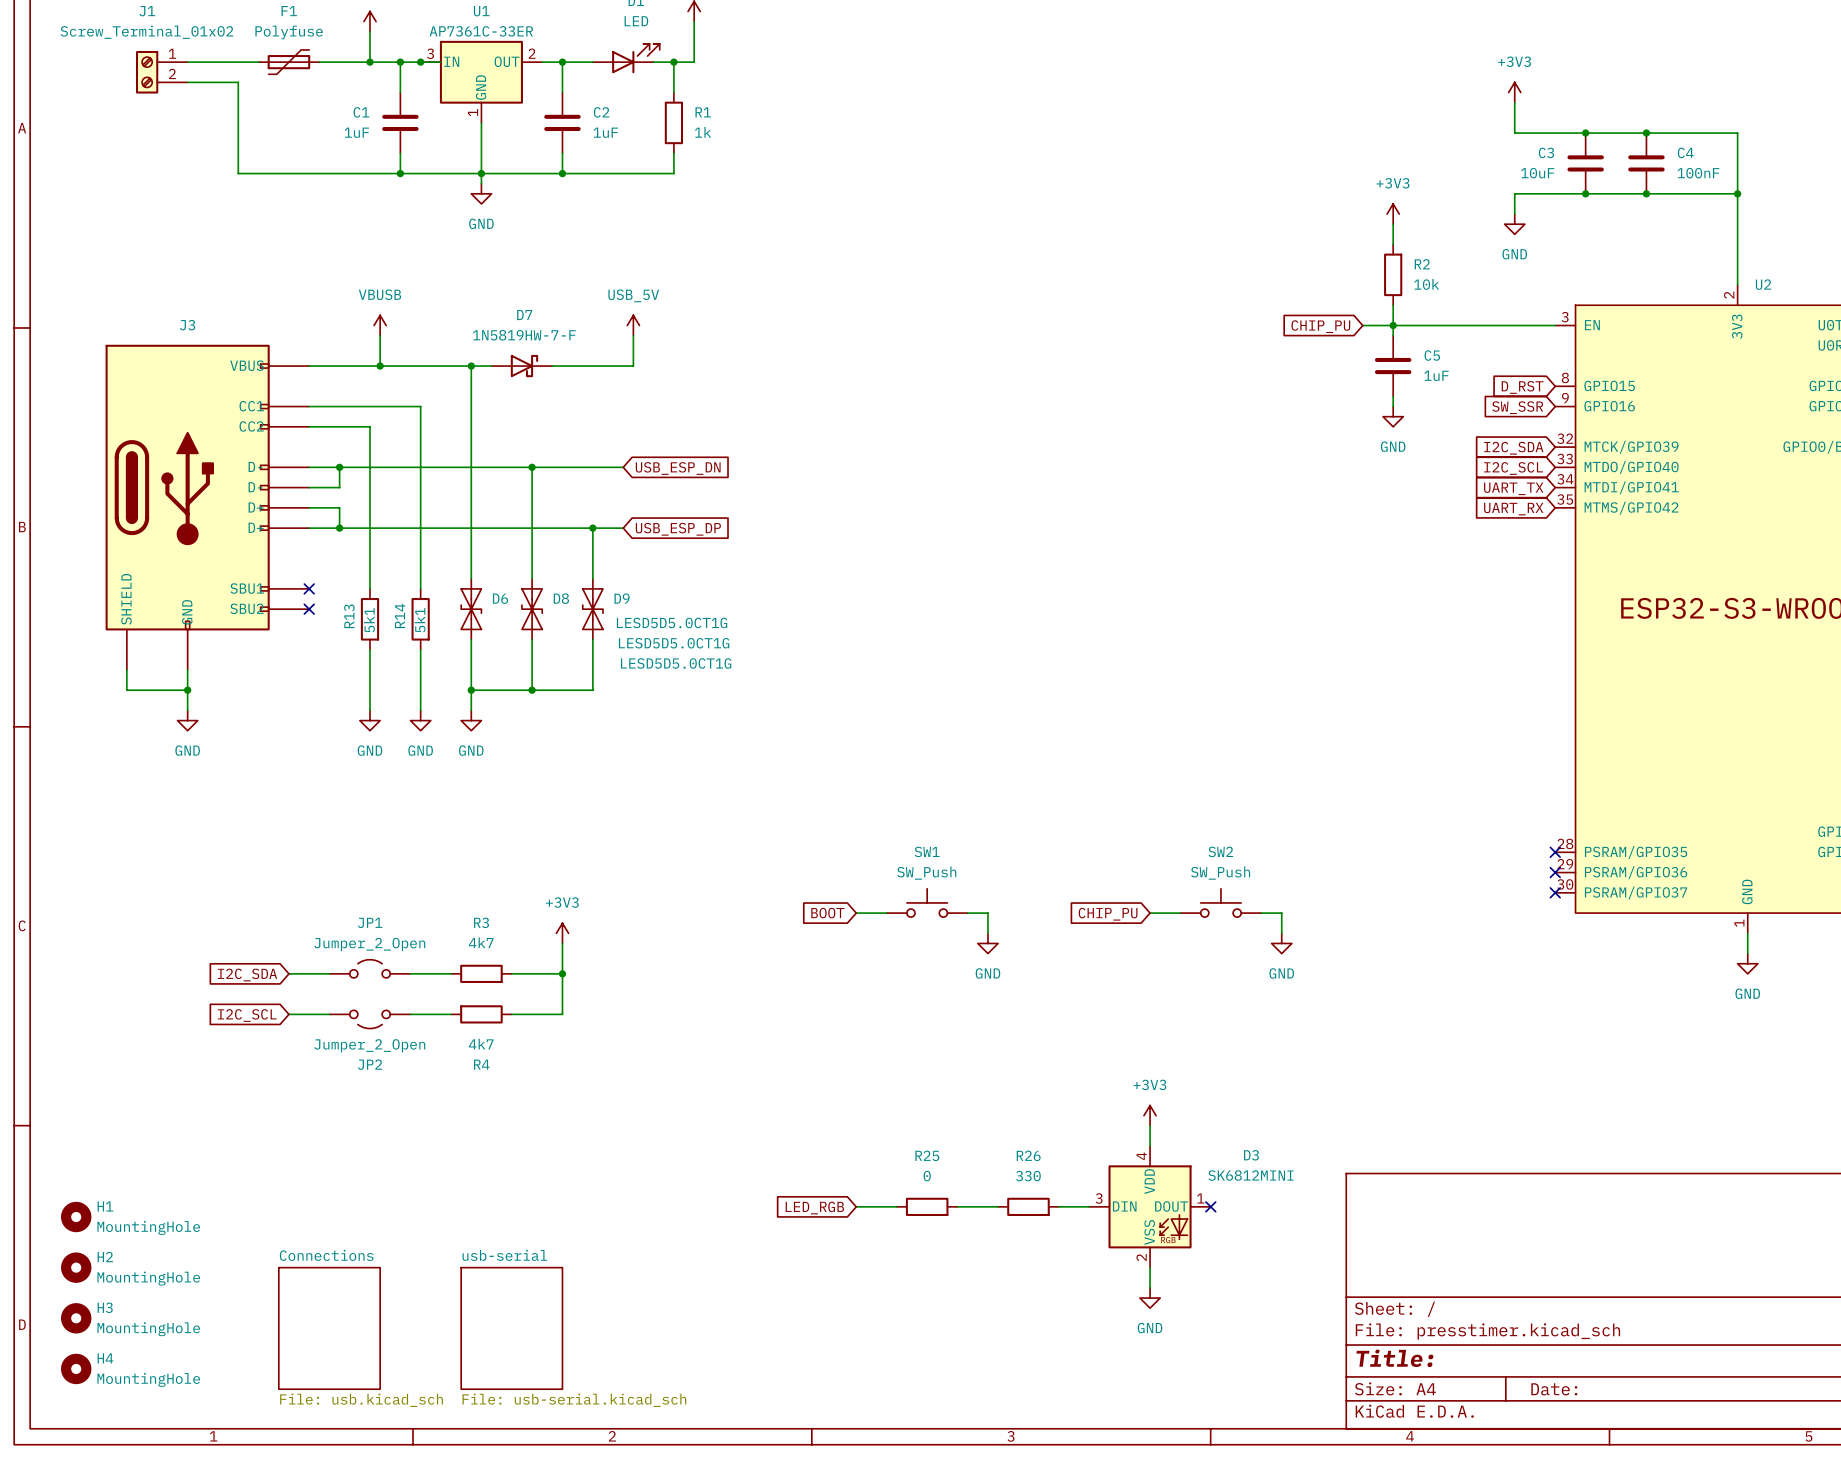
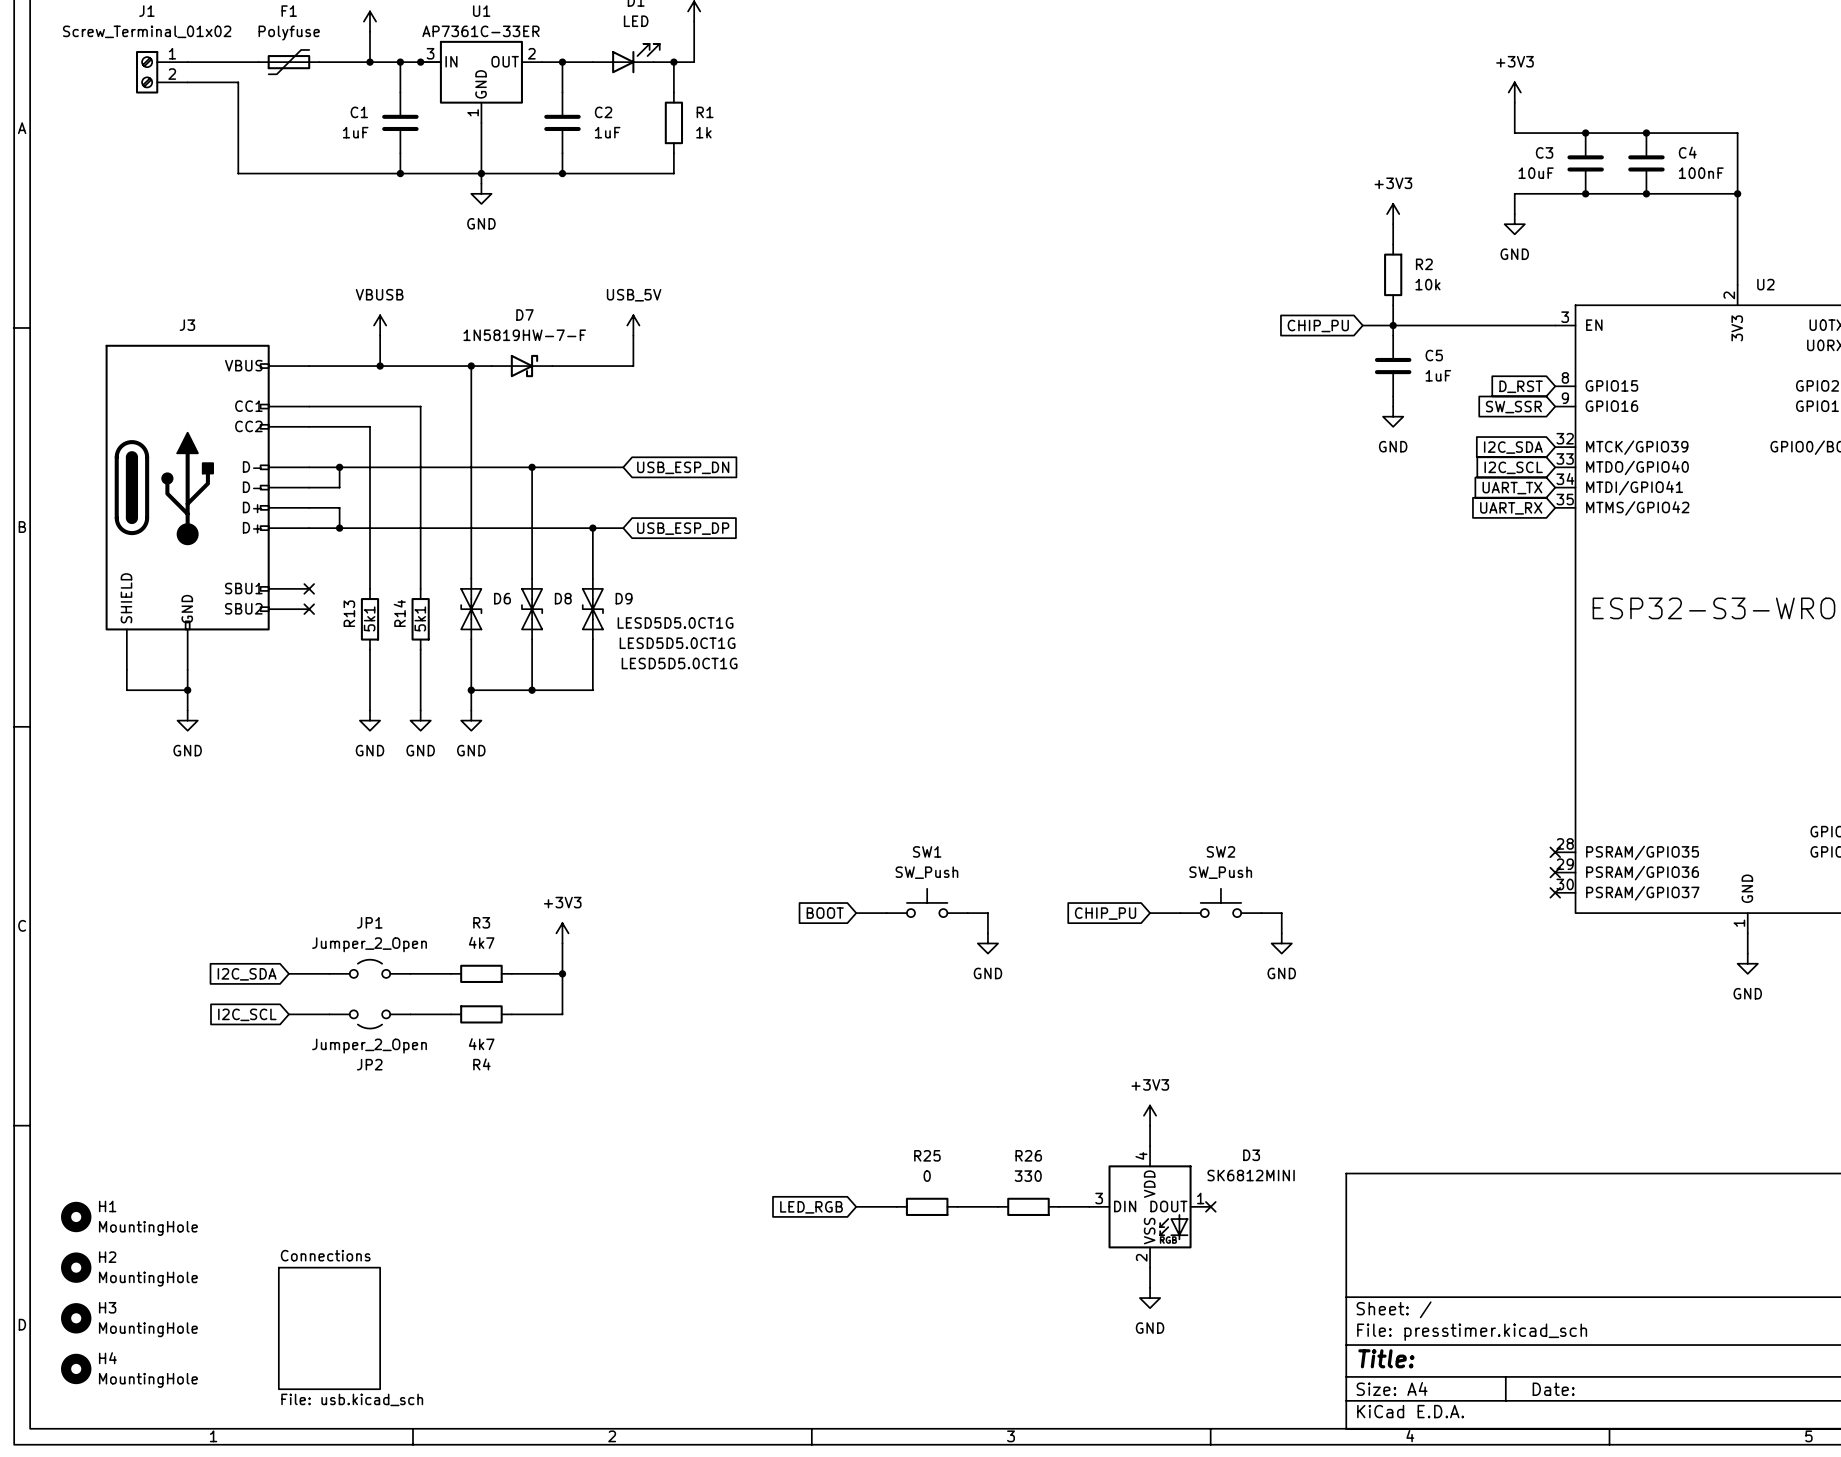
sheet usb-serial: File: usb-serial.kicad_sch (511, 1328) -> none

